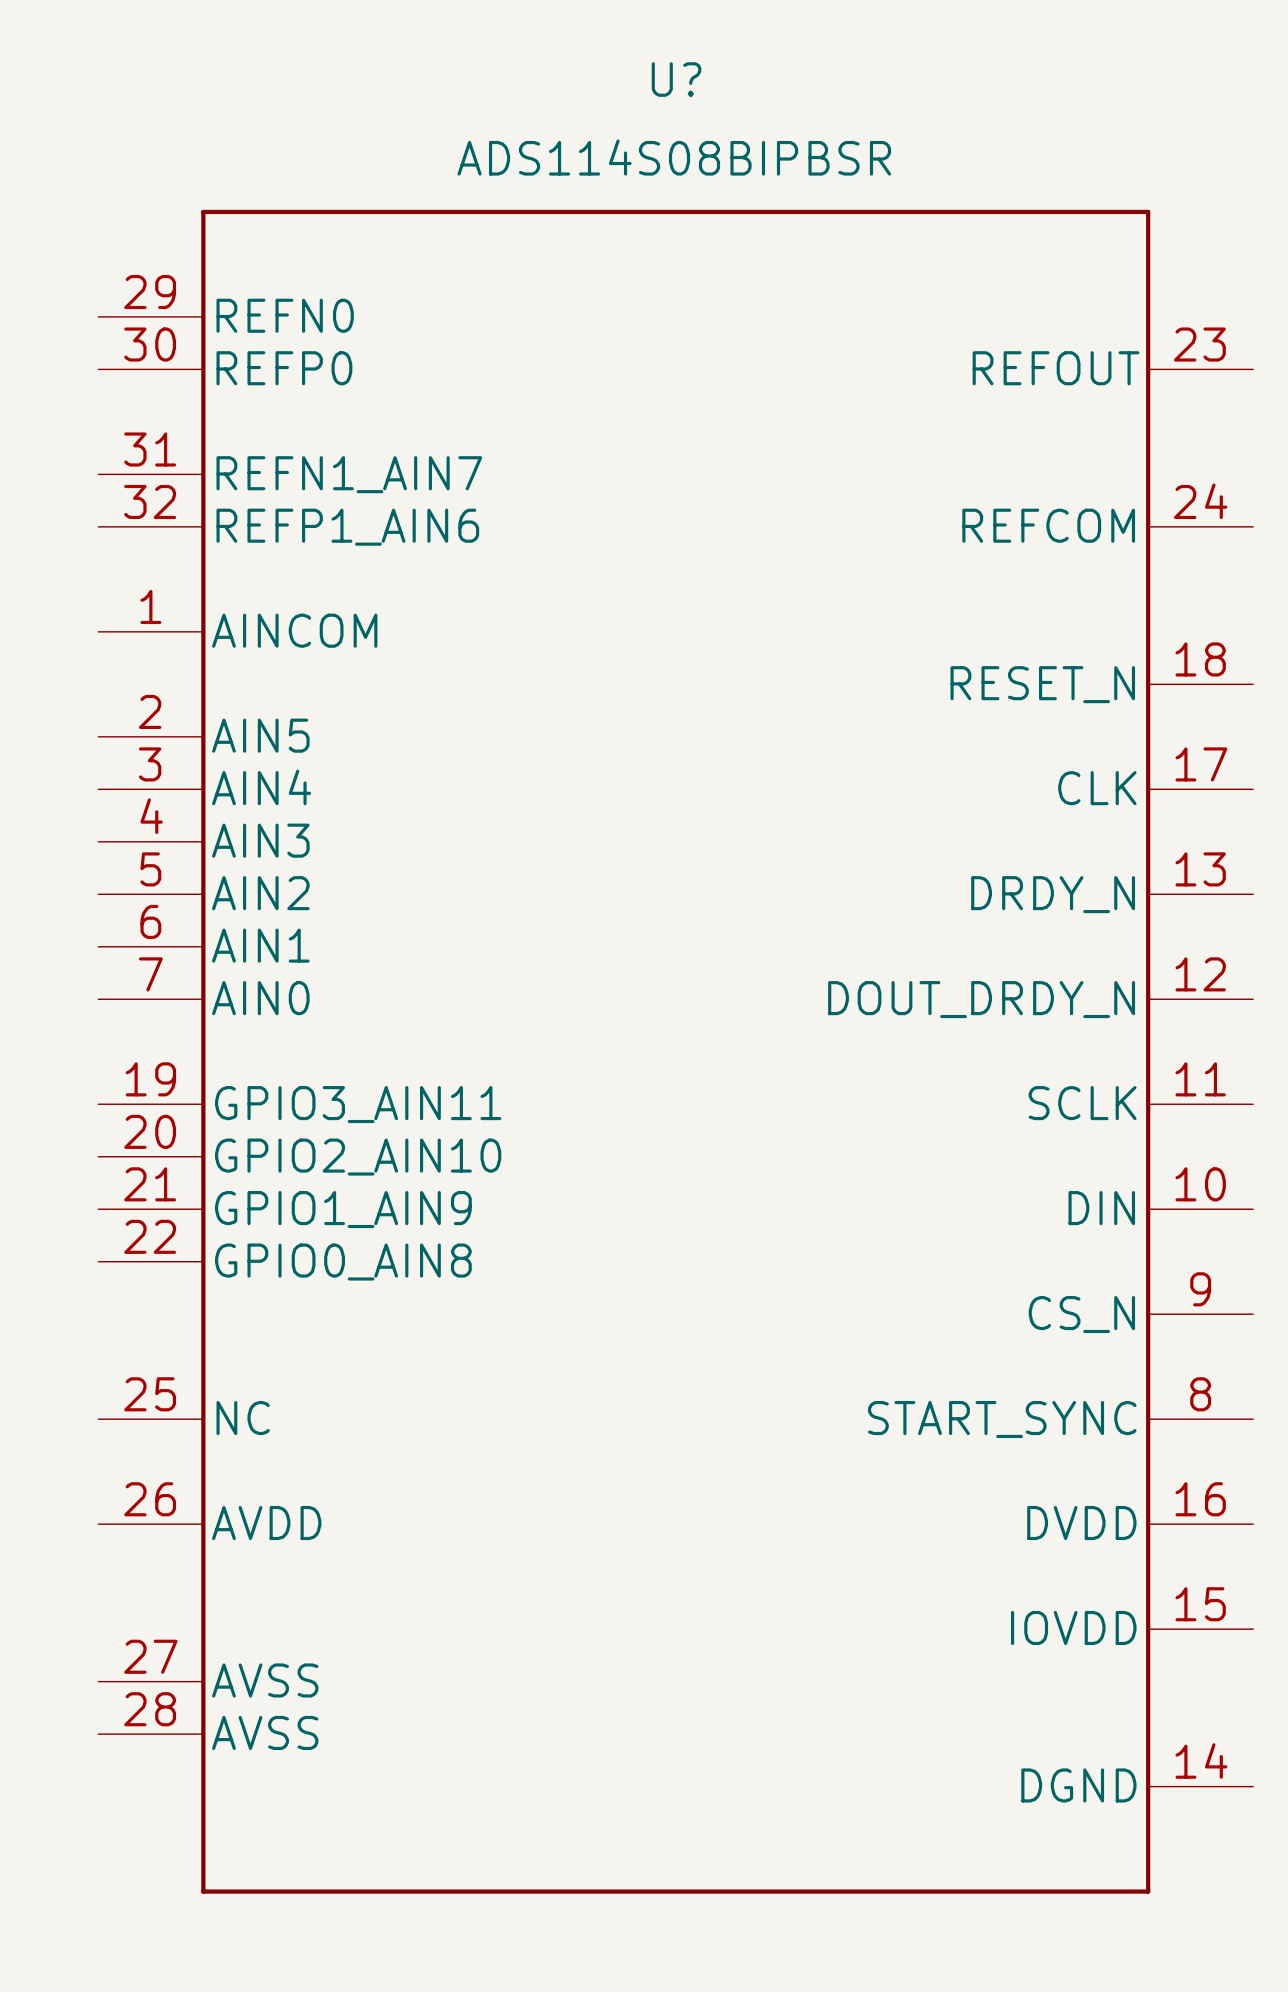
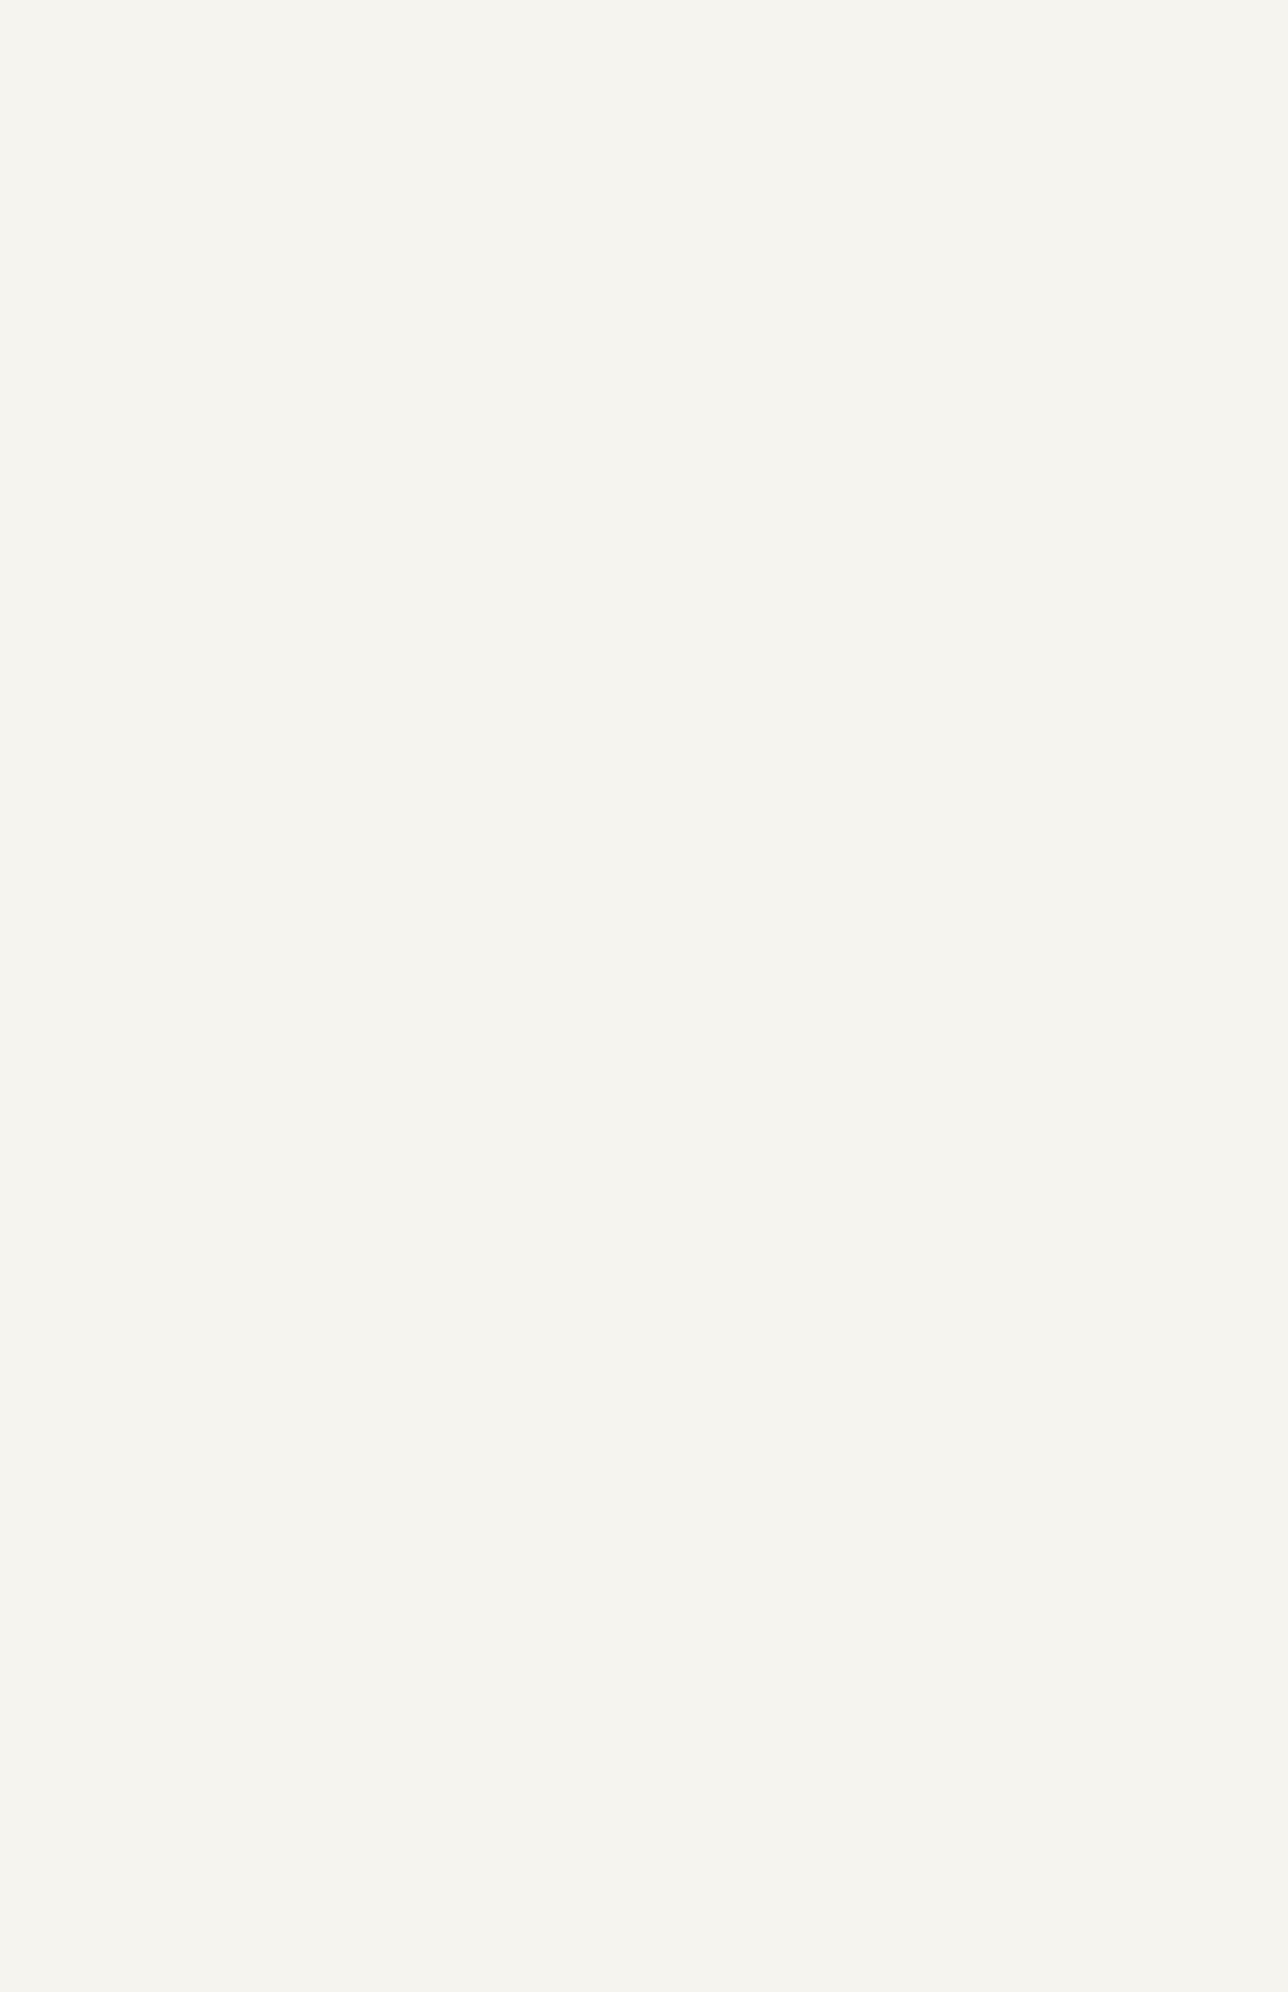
U?: ADS114S08BIPBSR (675, 1051) -> none

